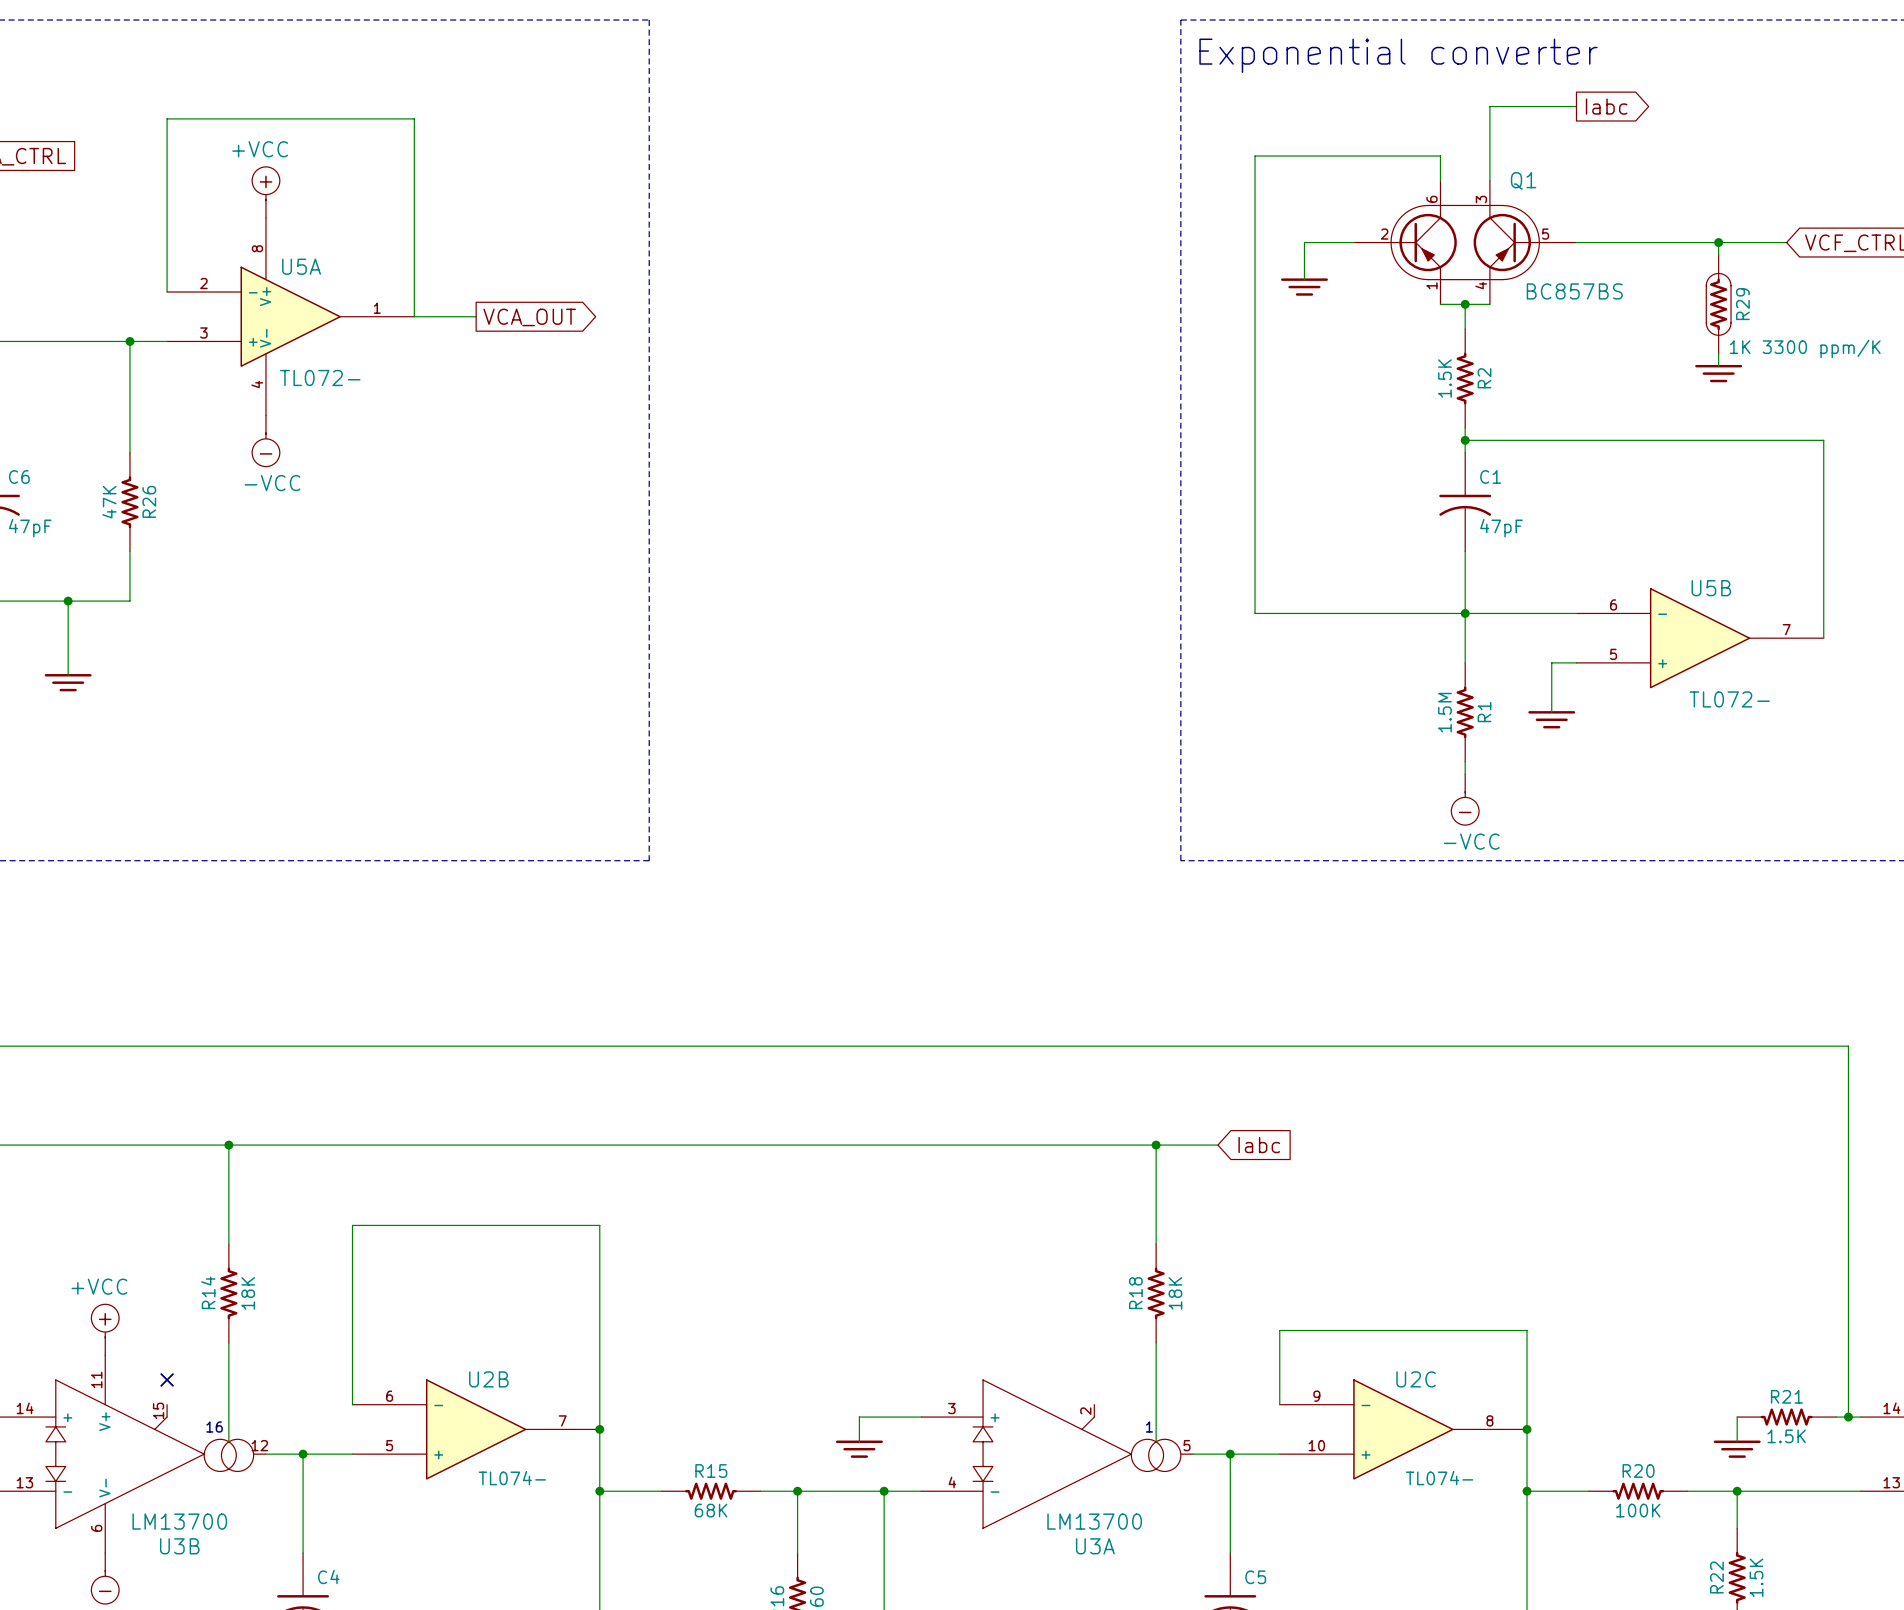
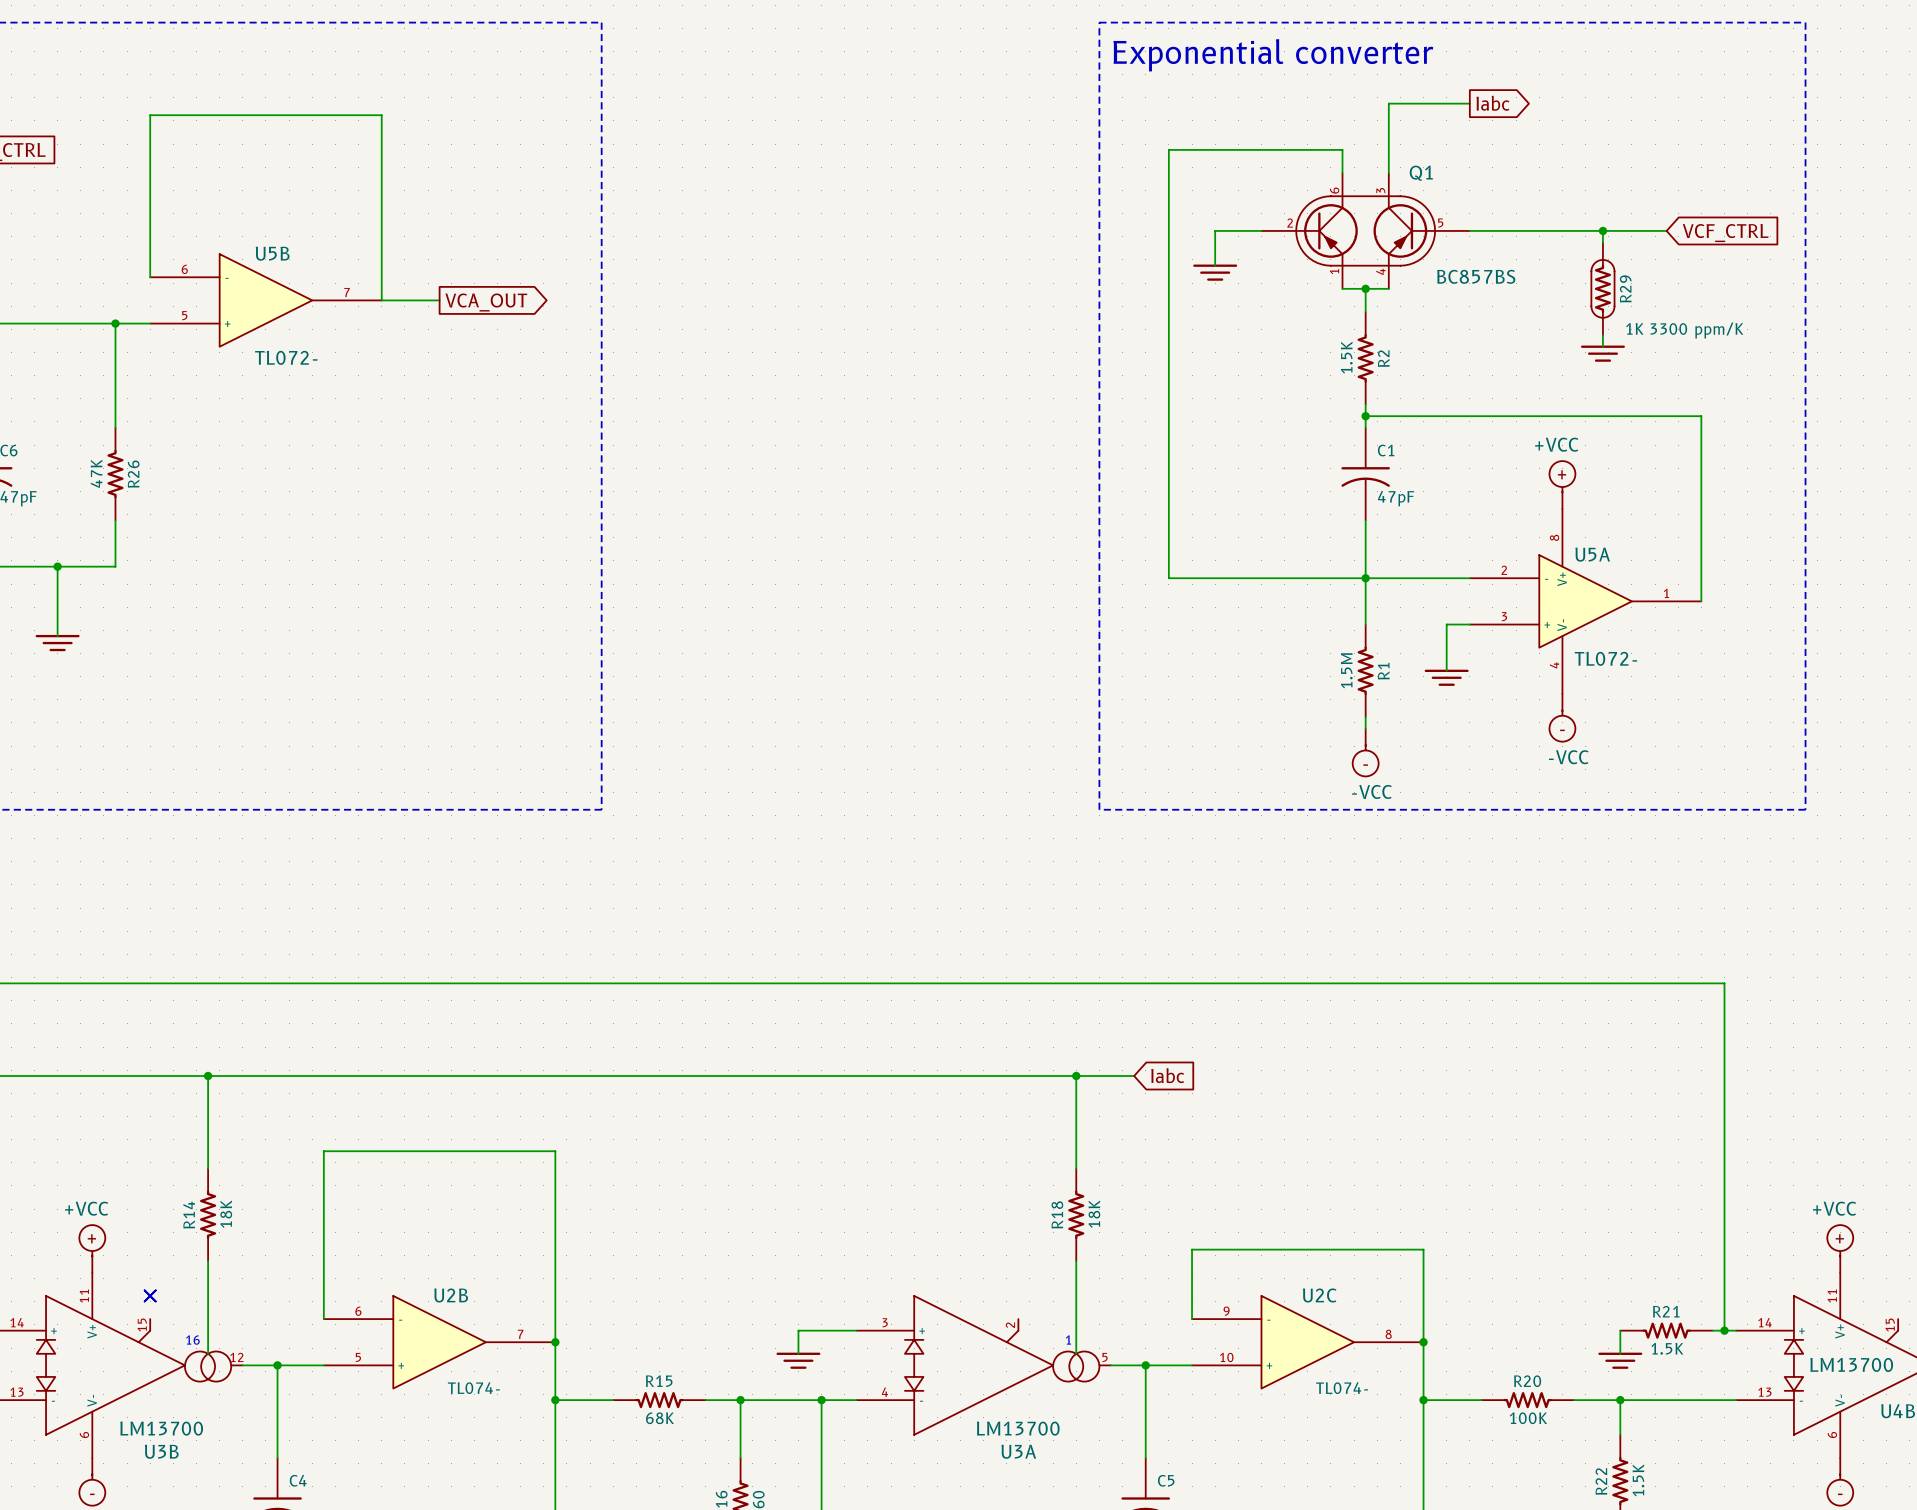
power symbol: +VCC (265, 192) -> none
U5A position: (290, 316) -> (1585, 601)
power symbol: -VCC (265, 441) -> none
power symbol: none -> +VCC (1562, 484)
U5B position: (1700, 638) -> (265, 300)
power symbol: none -> -VCC (1562, 717)

